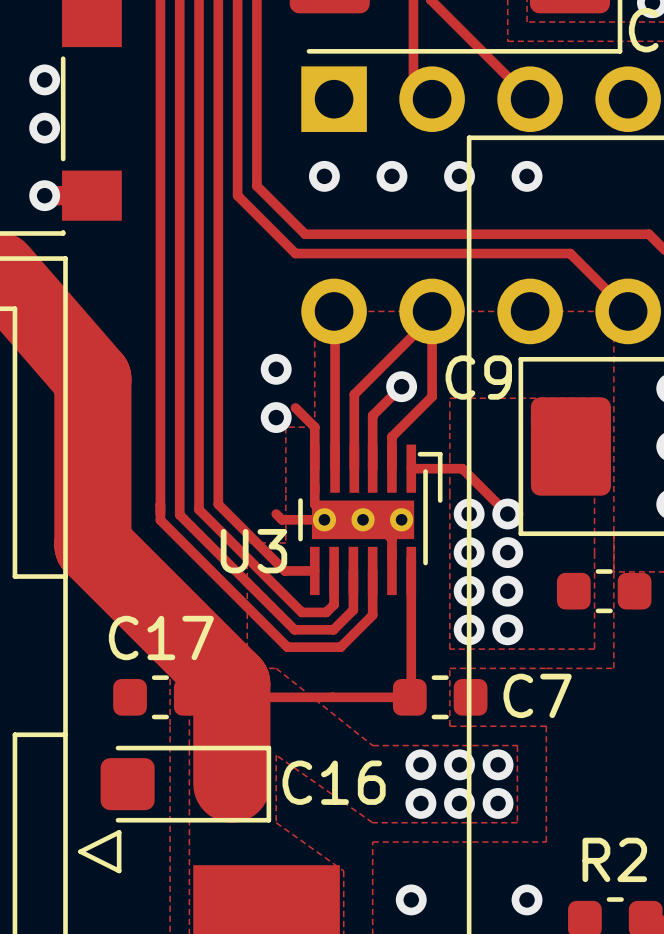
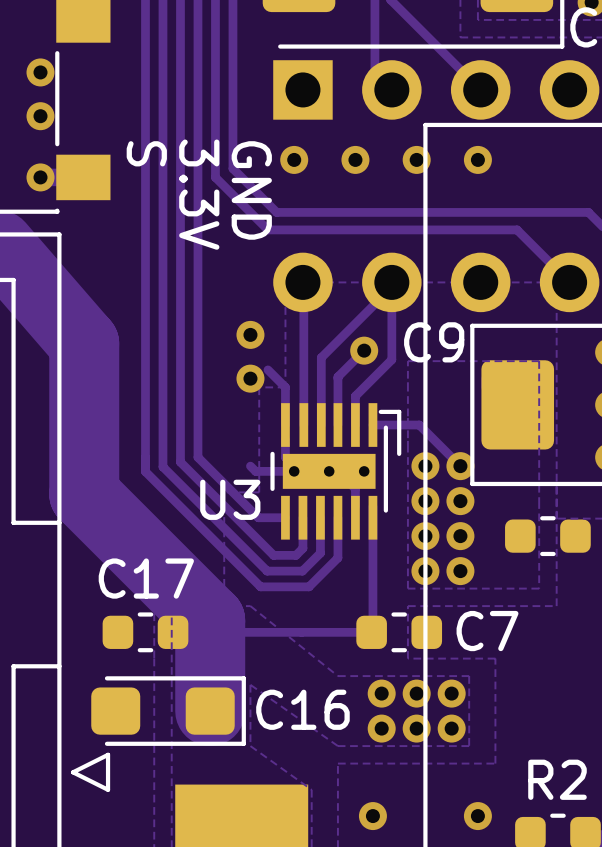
text: none -> S (146, 153)
text: none -> GND (251, 190)
text: none -> 3.3V (199, 194)

